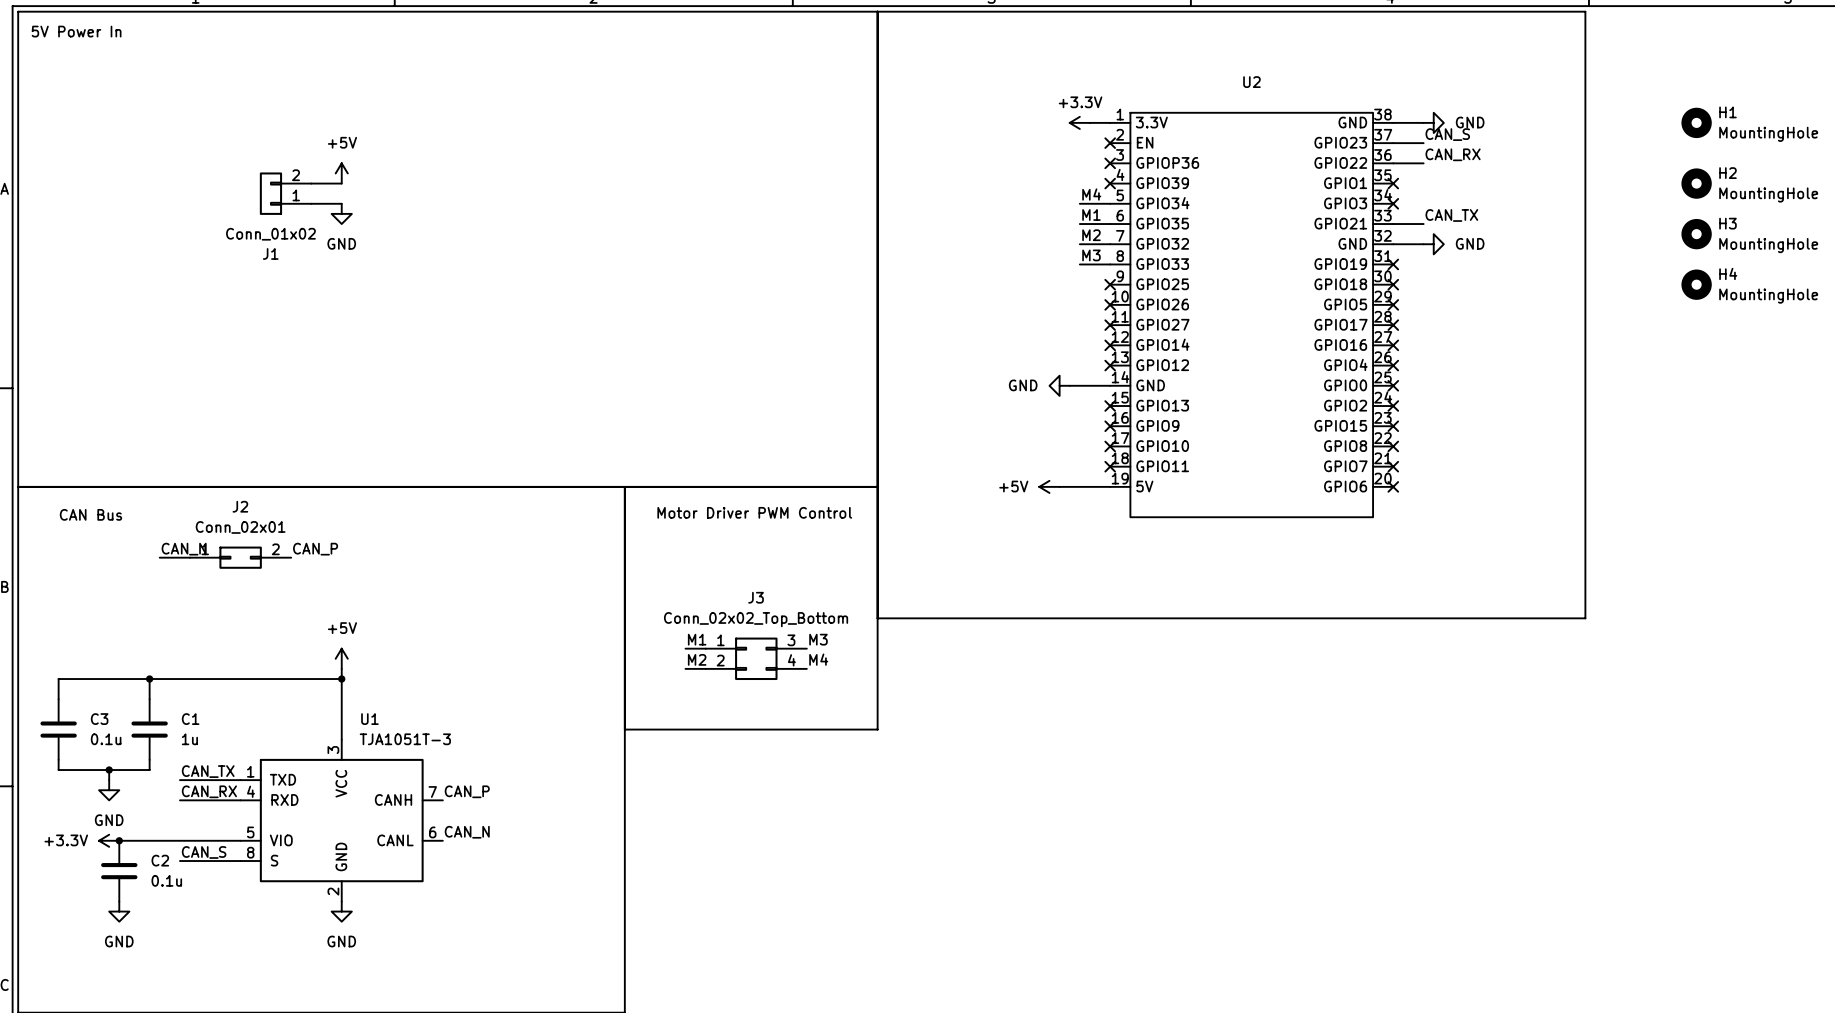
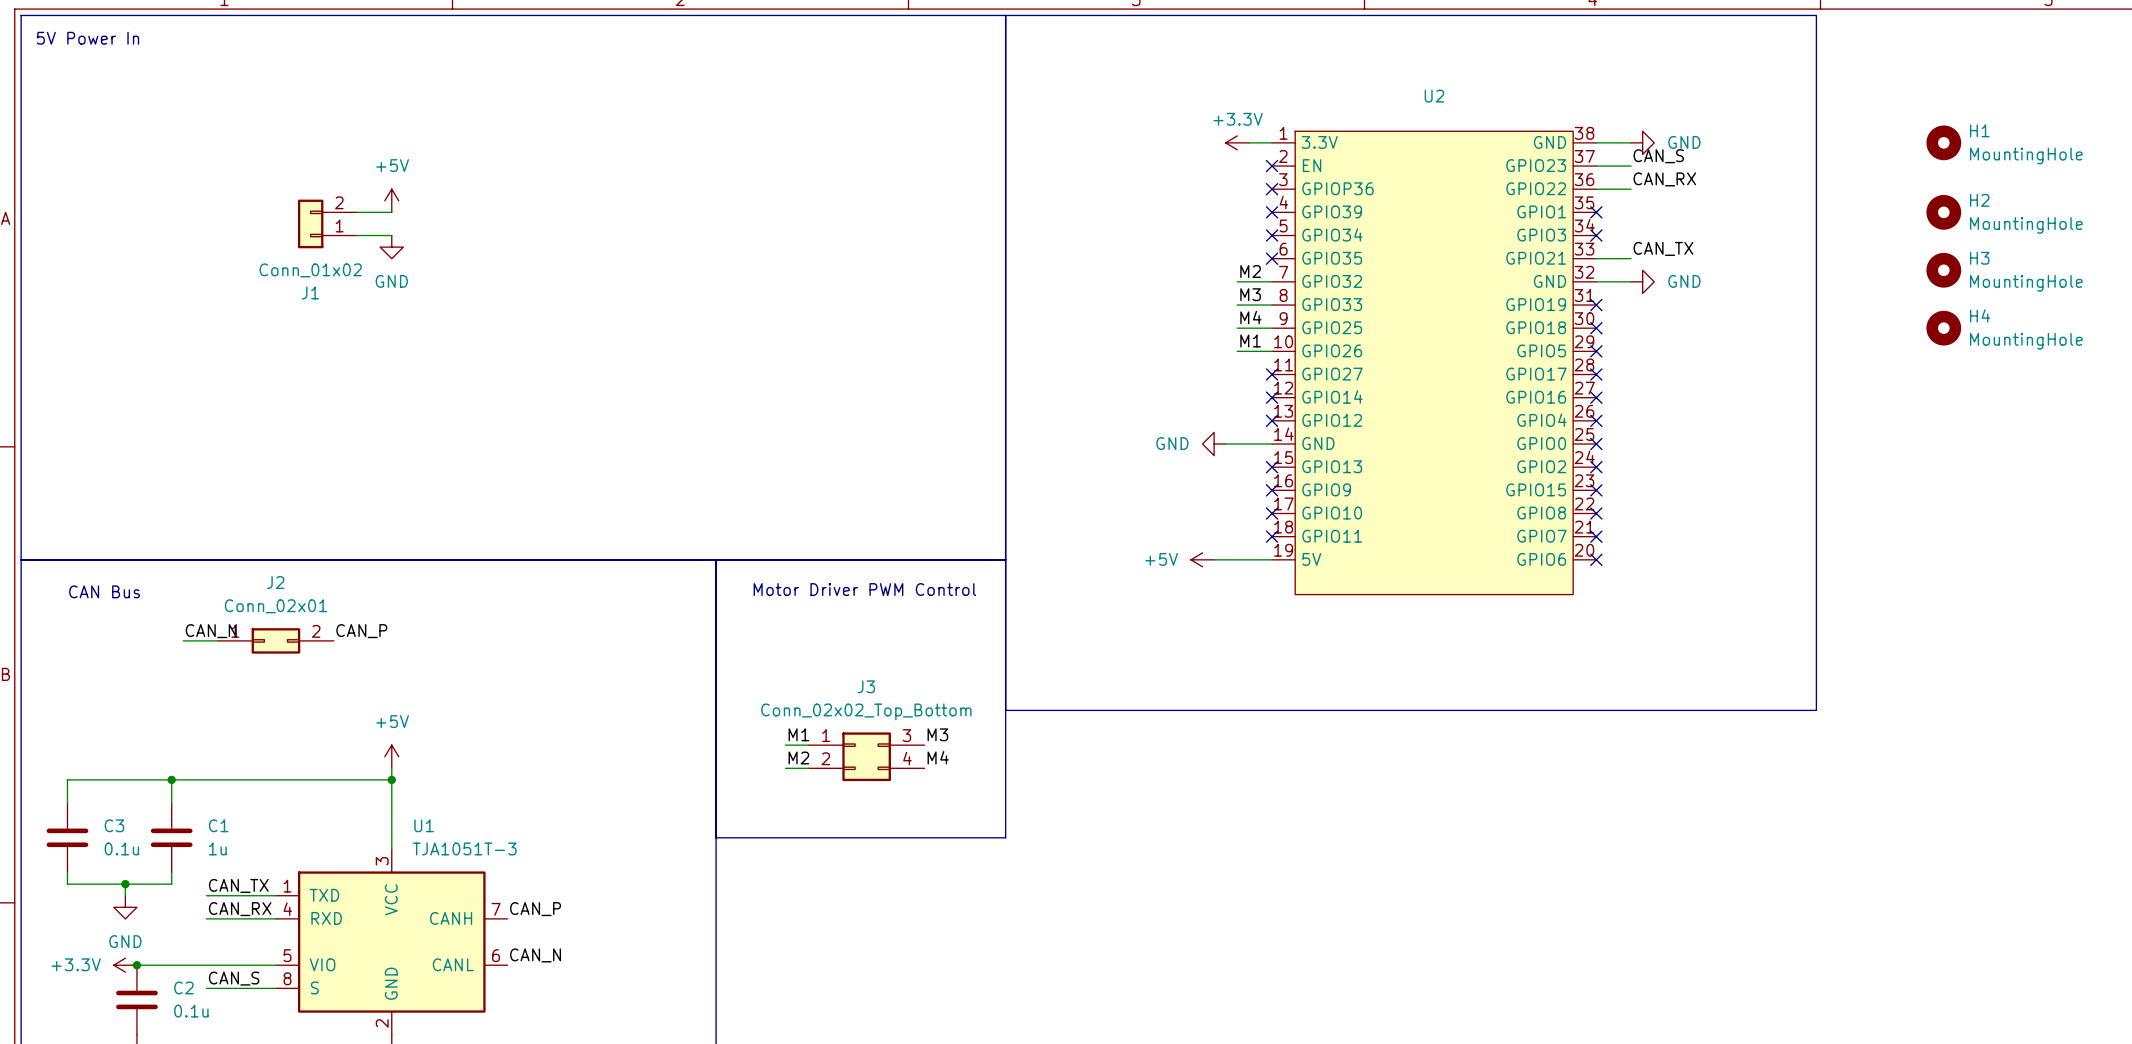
label position: M4 (1091, 194) -> M4 (1250, 317)
wire: (1079, 203) (1110, 203) -> (1237, 351) (1272, 351)
no-connect mark: none -> (1272, 235)
label position: M1 (1091, 214) -> M1 (1250, 341)
wire: (1079, 224) (1110, 224) -> (1237, 328) (1272, 328)
no-connect mark: none -> (1272, 258)
no-connect mark: (1110, 284) -> none
no-connect mark: (1110, 304) -> none

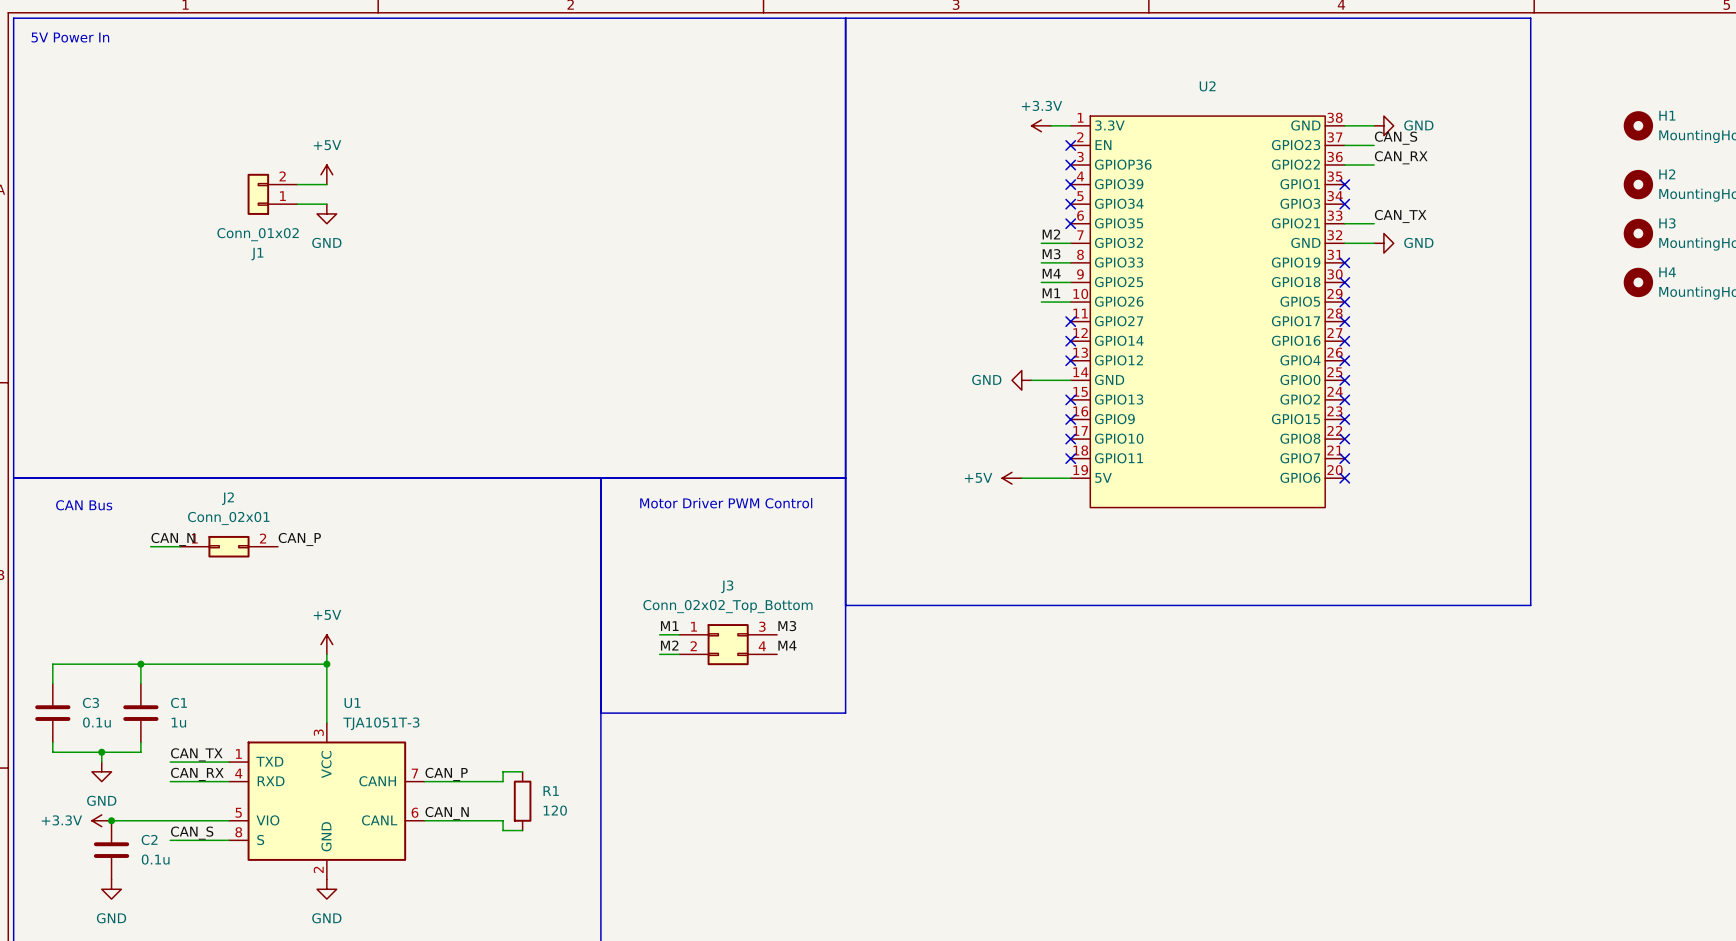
wire: none -> (522, 771) (503, 771) (503, 781) (424, 781)
R1: none -> 120 (522, 801)
wire: none -> (424, 820) (503, 820) (503, 830) (522, 830)

